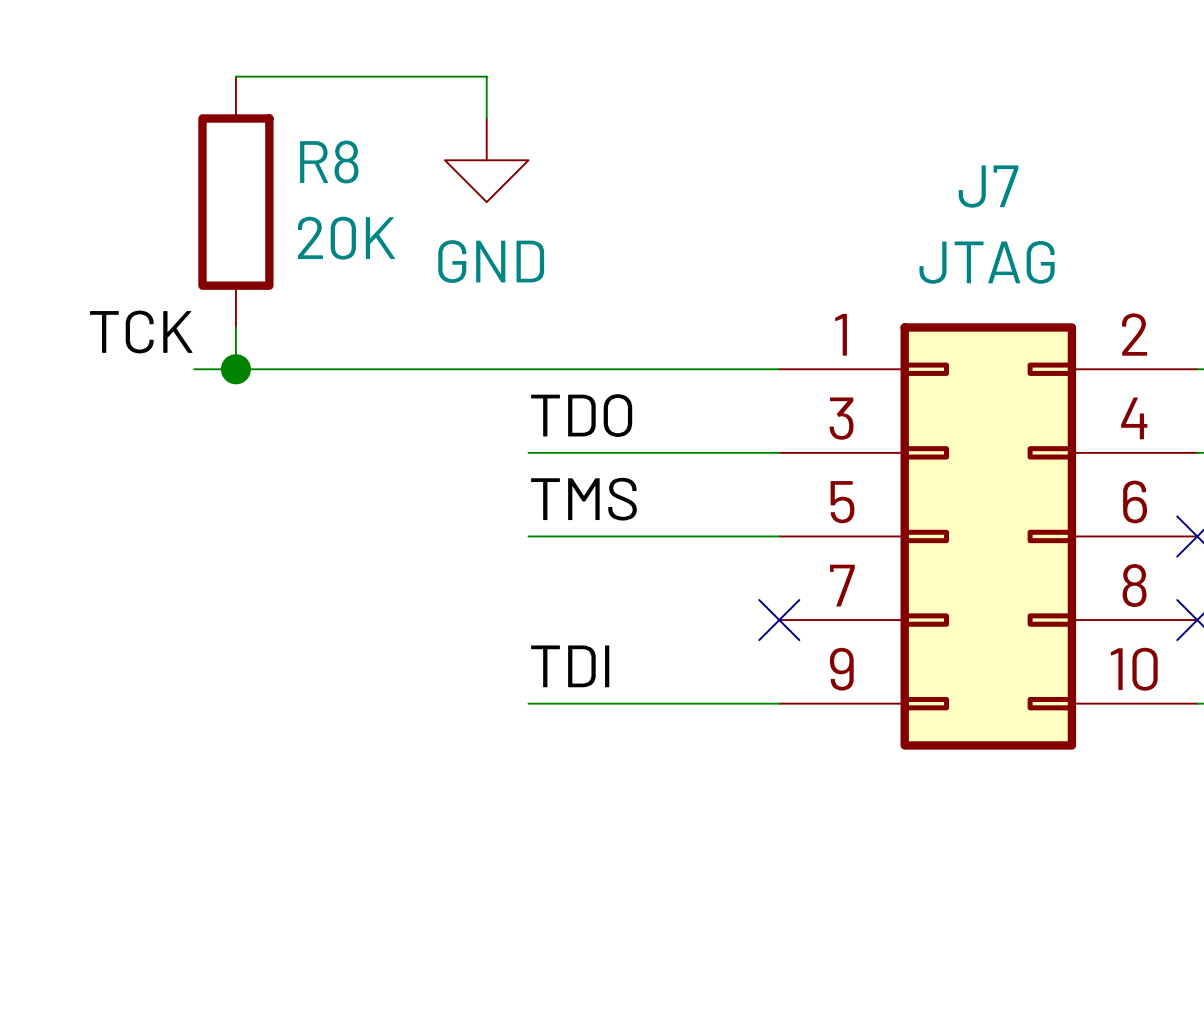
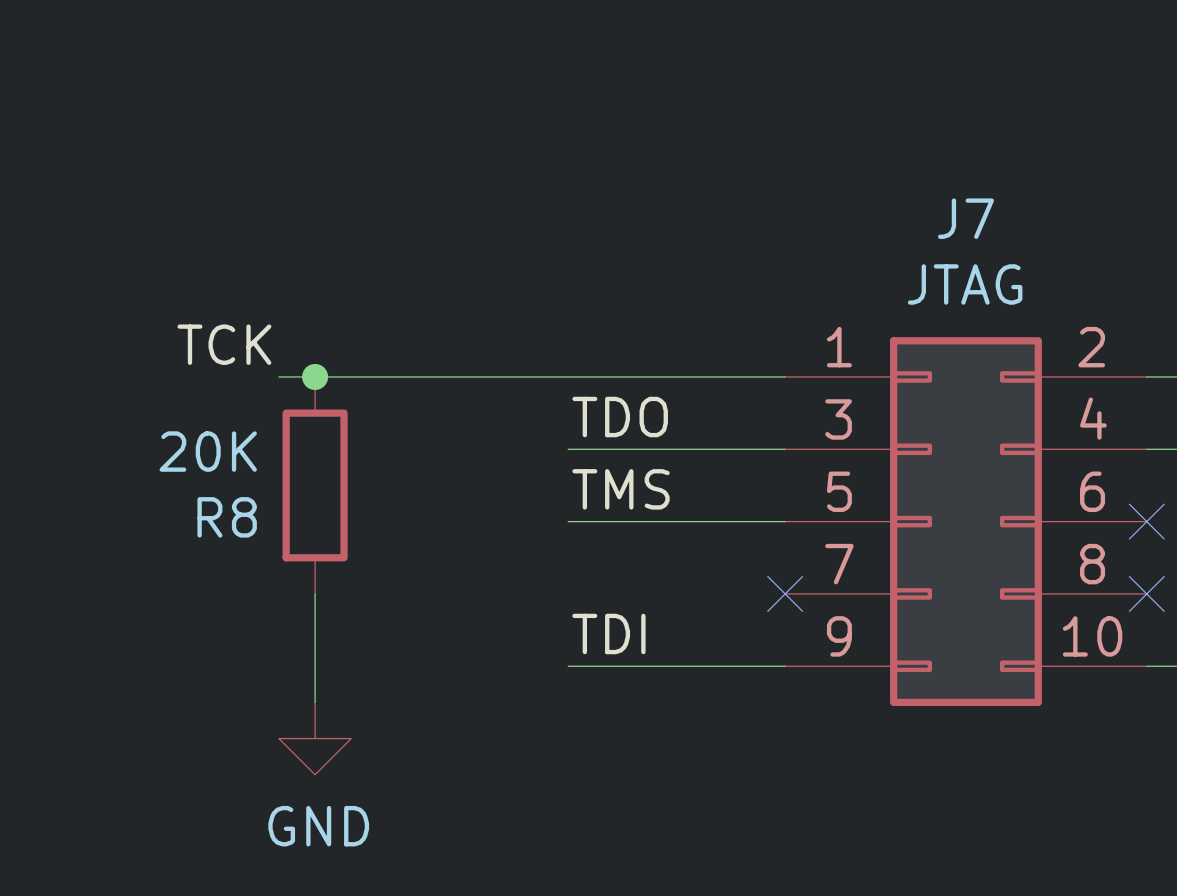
wire: (235, 76) (486, 76) (486, 118) -> none
power symbol position: GND (486, 160) -> GND (315, 738)
R8 name position: R8 (329, 161) -> R8 (227, 517)
R8 position: (235, 202) -> (315, 485)
R8 value position: 20K (346, 238) -> 20K (208, 451)
wire: (235, 327) (235, 369) -> none
wire: none -> (315, 593) (315, 702)

